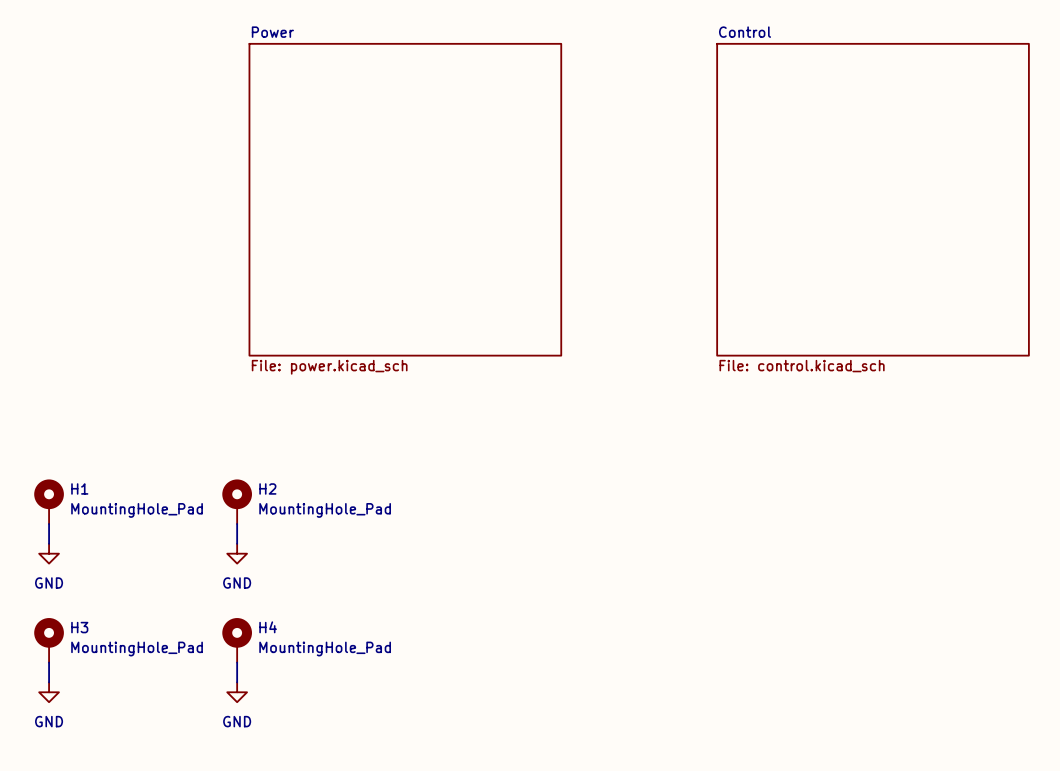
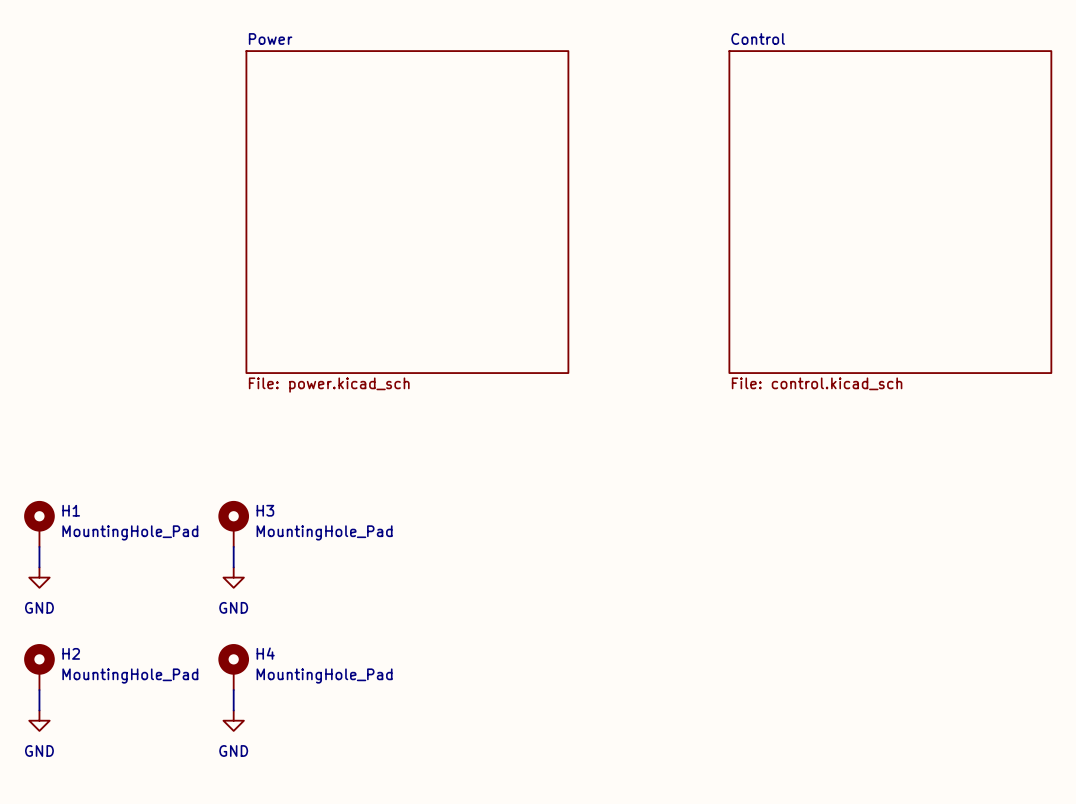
H2 name: H2 (267, 488) -> H3 (265, 510)
H3 name: H3 (79, 627) -> H2 (71, 653)

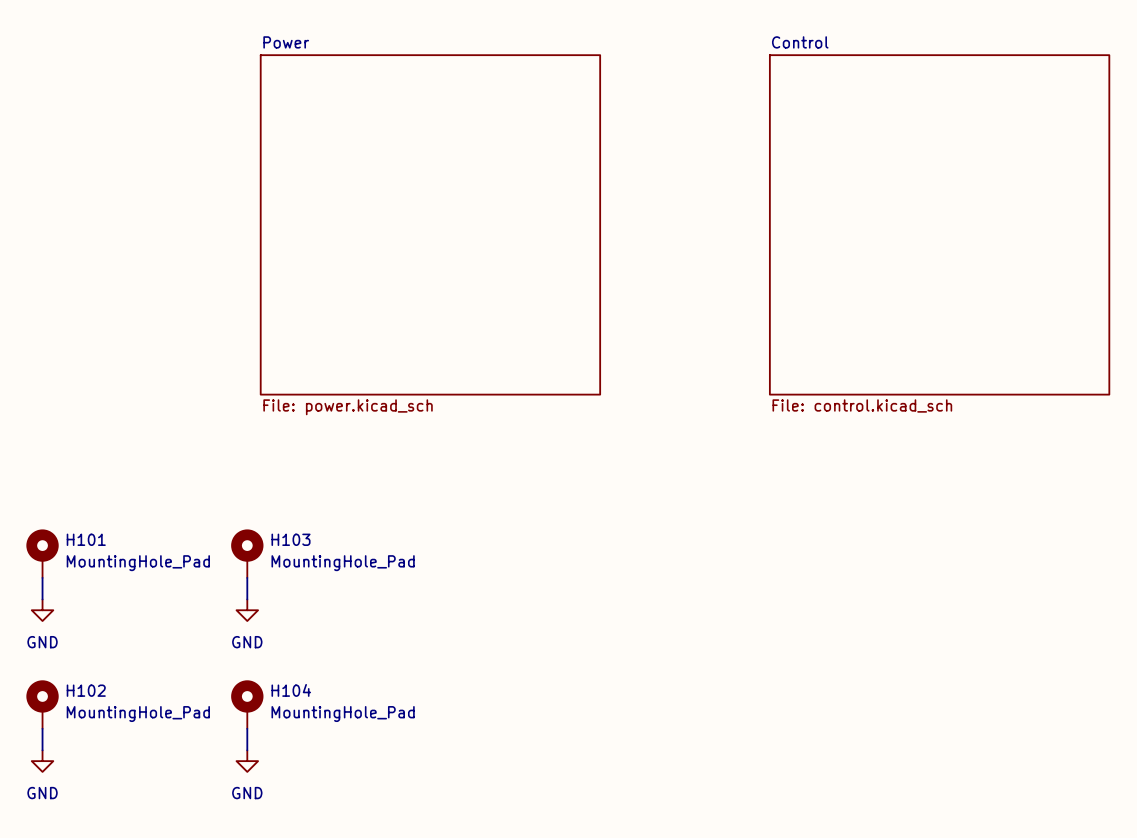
H1 name: H1 (71, 510) -> H101 (86, 539)
H3 name: H3 (265, 510) -> H103 (291, 539)
H2 name: H2 (71, 653) -> H102 (86, 690)
H4 name: H4 (265, 653) -> H104 (291, 690)

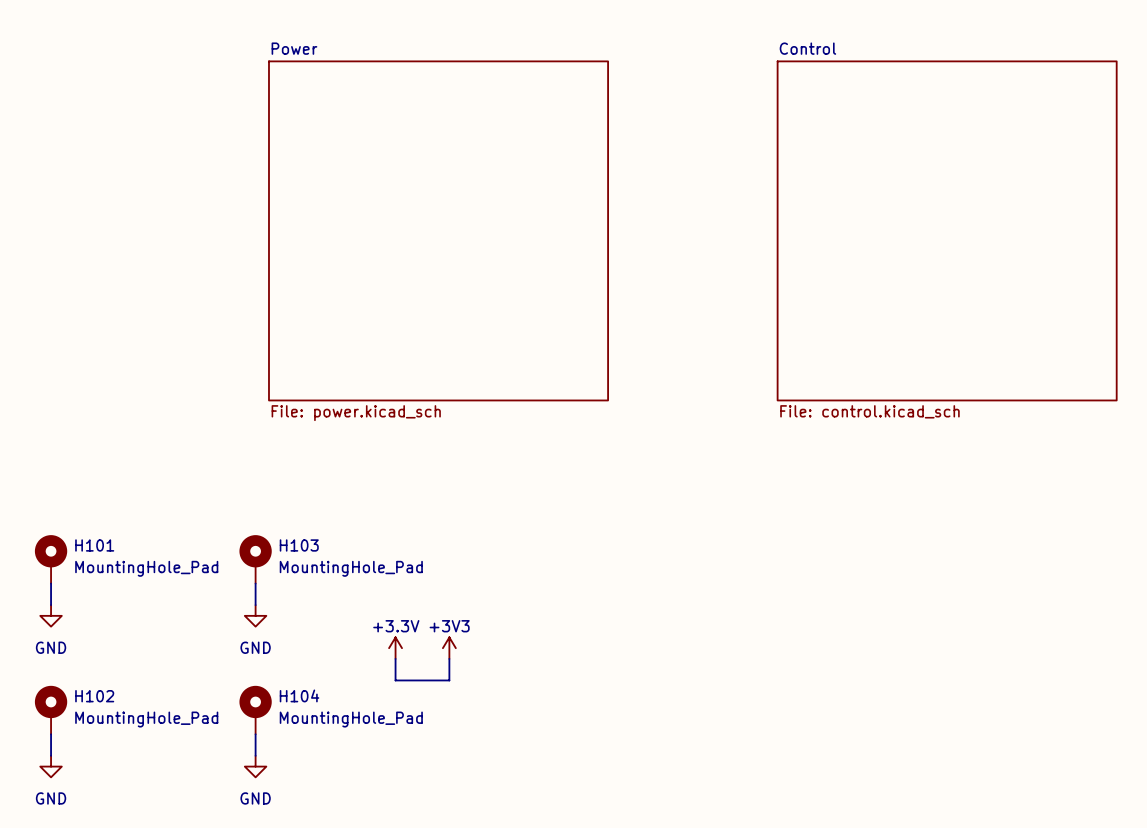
power symbol: none -> +3.3V (395, 648)
power symbol: none -> +3V3 (449, 648)
wire: none -> (395, 658) (395, 680) (449, 680) (449, 658)

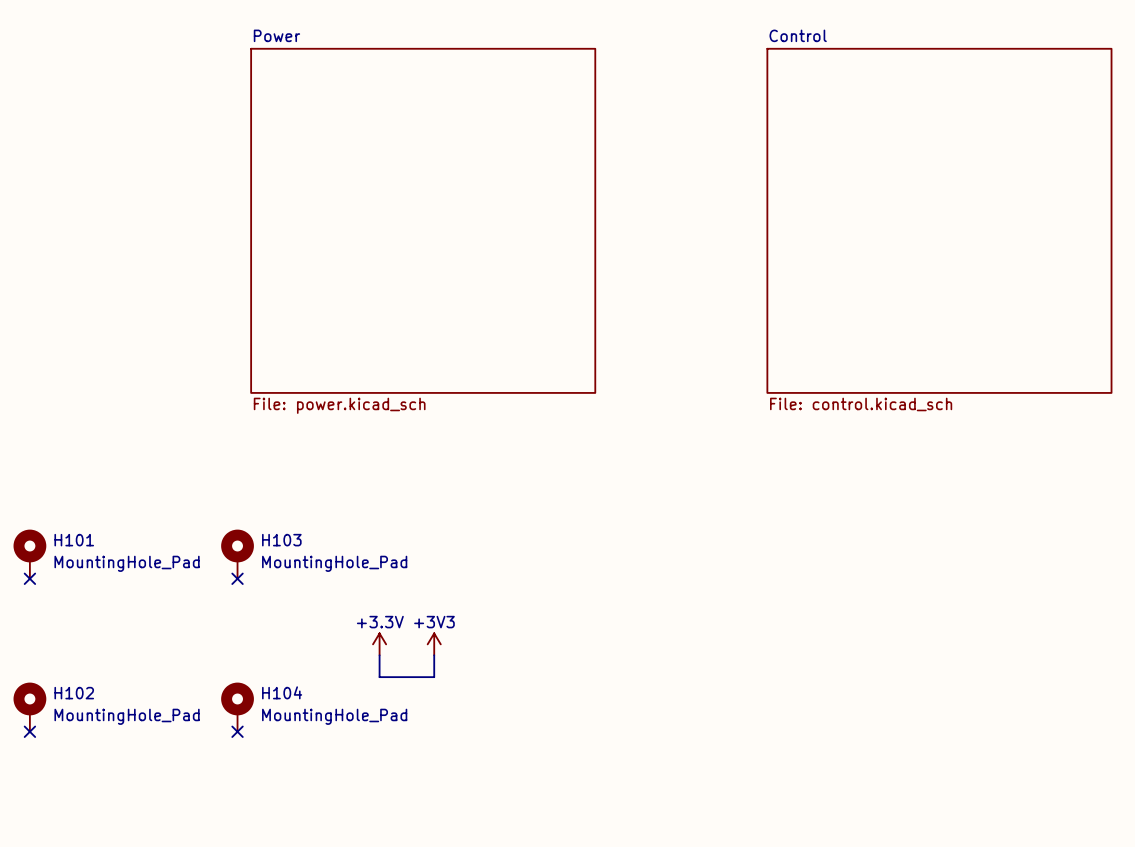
wire: (51, 583) (51, 605) -> none
no-connect mark: none -> (29, 578)
wire: (255, 583) (255, 605) -> none
no-connect mark: none -> (237, 578)
power symbol: GND (51, 615) -> none
power symbol: GND (255, 615) -> none
wire: (51, 734) (51, 755) -> none
no-connect mark: none -> (29, 731)
wire: (255, 734) (255, 755) -> none
no-connect mark: none -> (237, 731)
power symbol: GND (51, 766) -> none
power symbol: GND (255, 766) -> none

